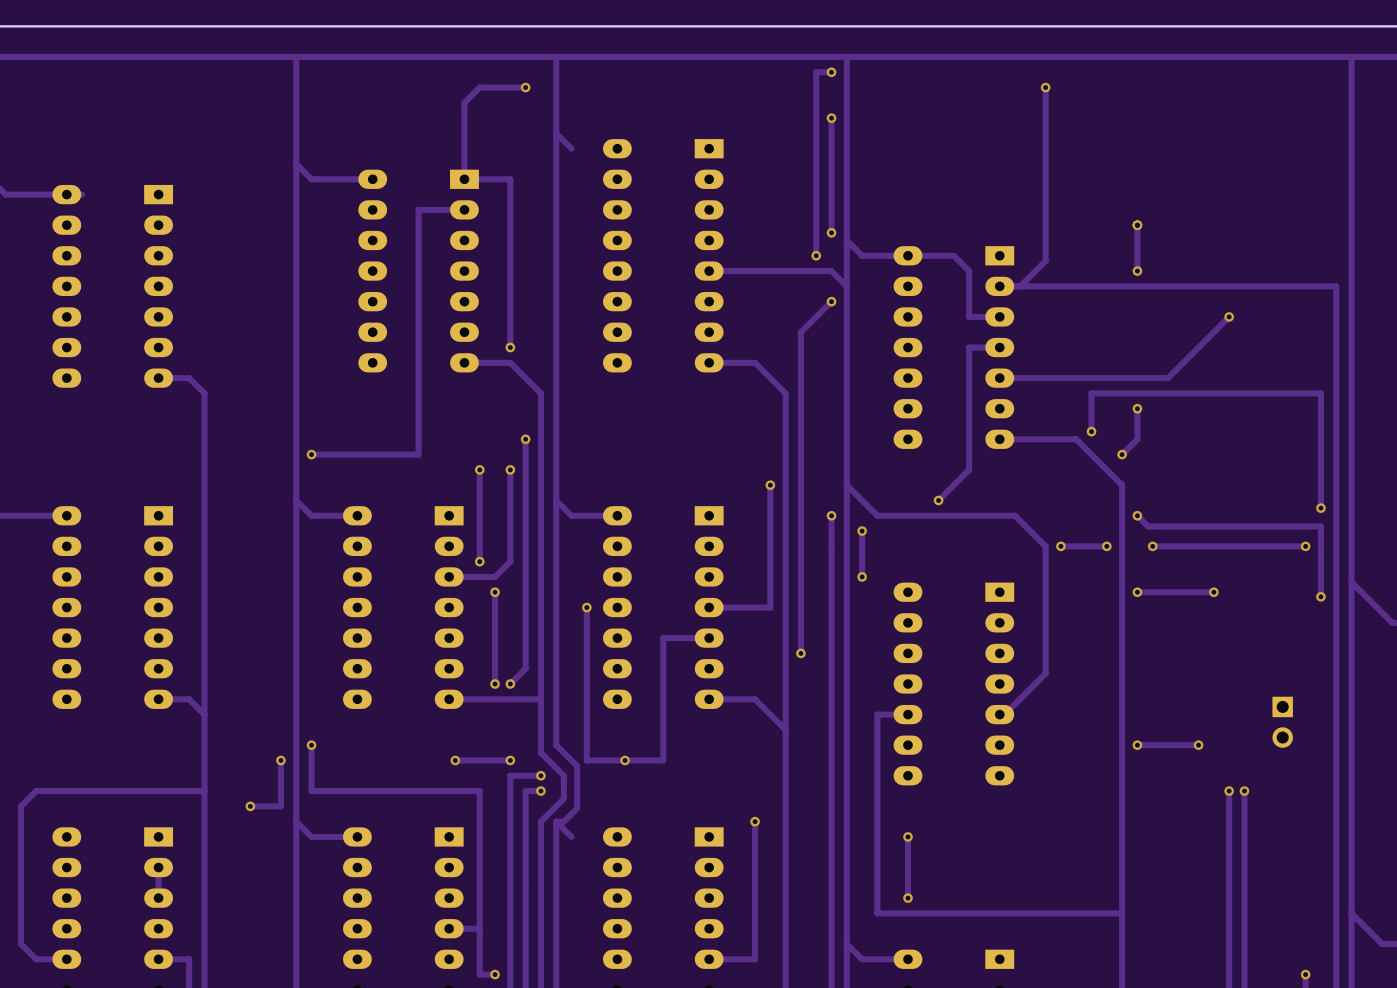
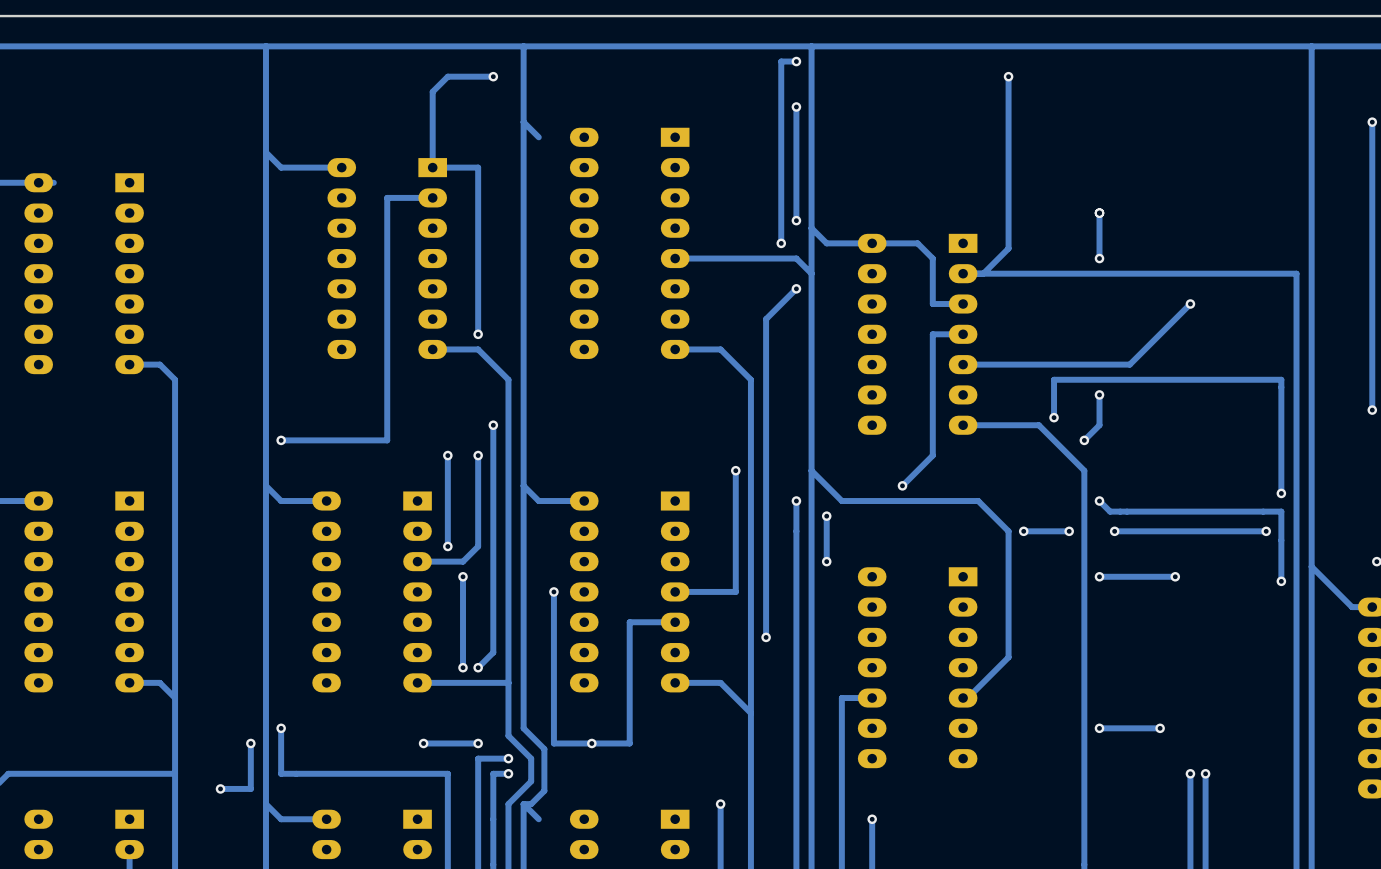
part: (1282, 722) -> none

